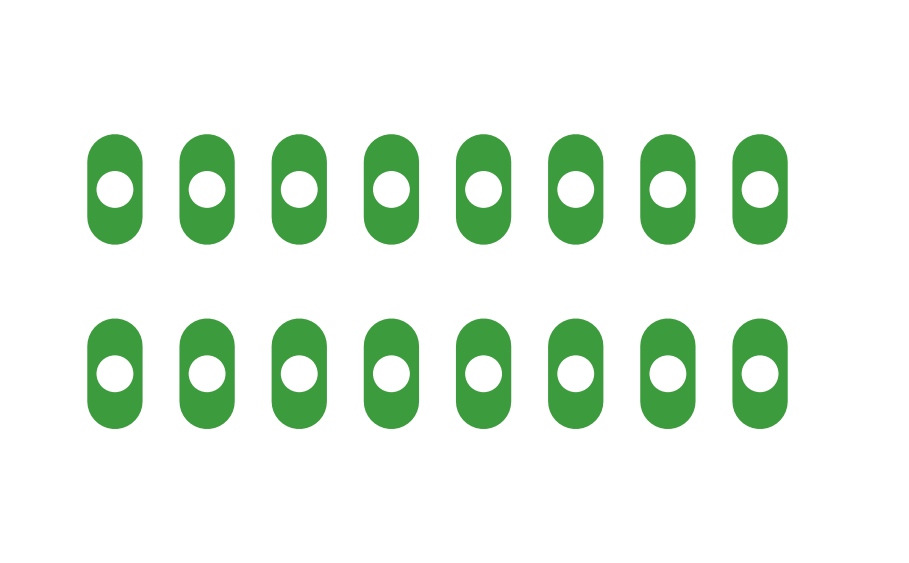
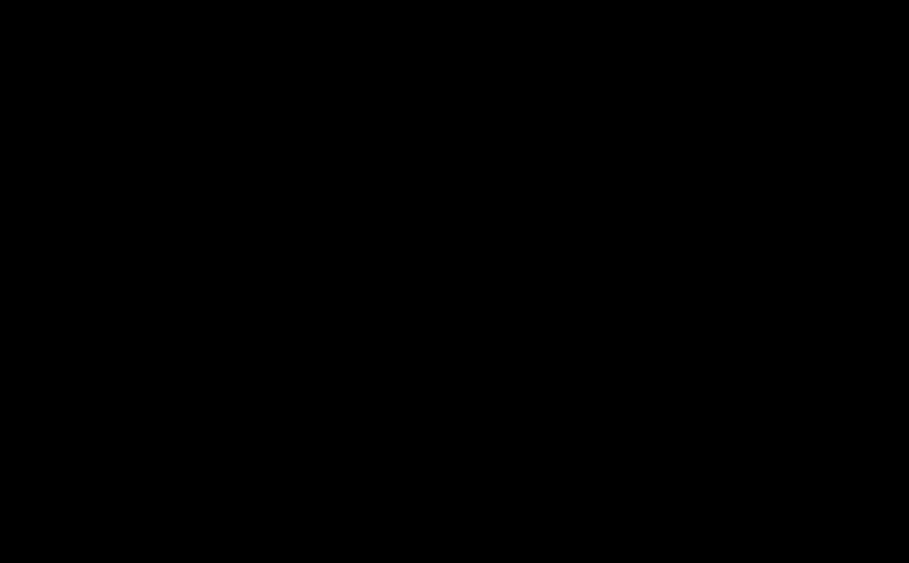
part: (437, 189) -> none
part: (437, 373) -> none

